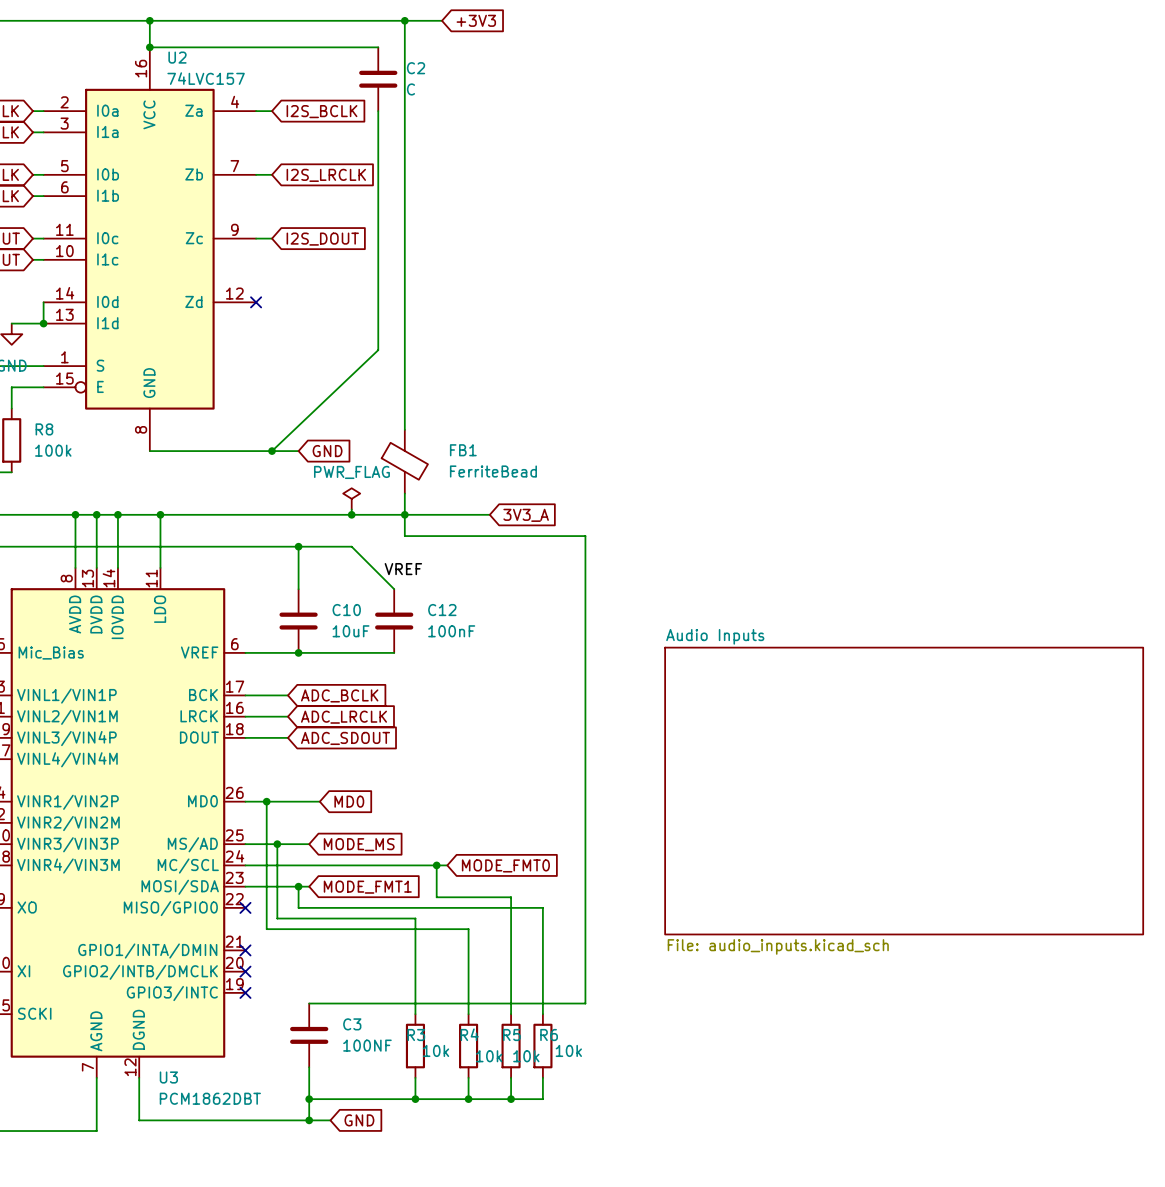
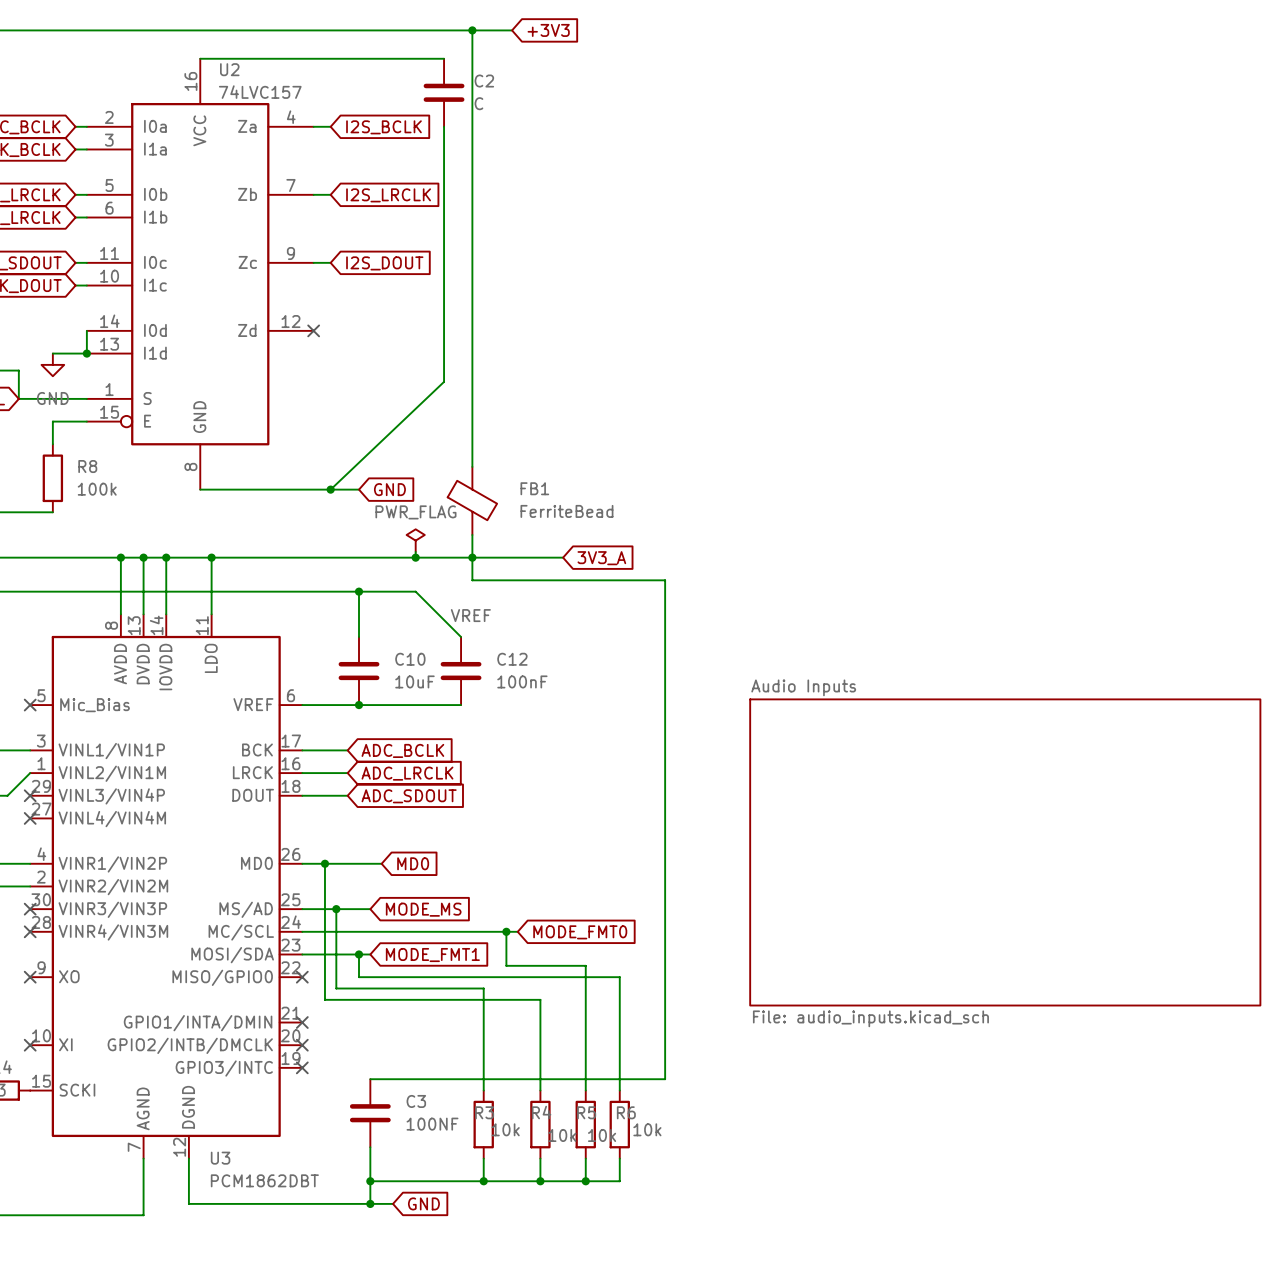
wire: (149, 20) (149, 47) -> none
junction: (149, 20) -> none
junction: (149, 47) -> none

